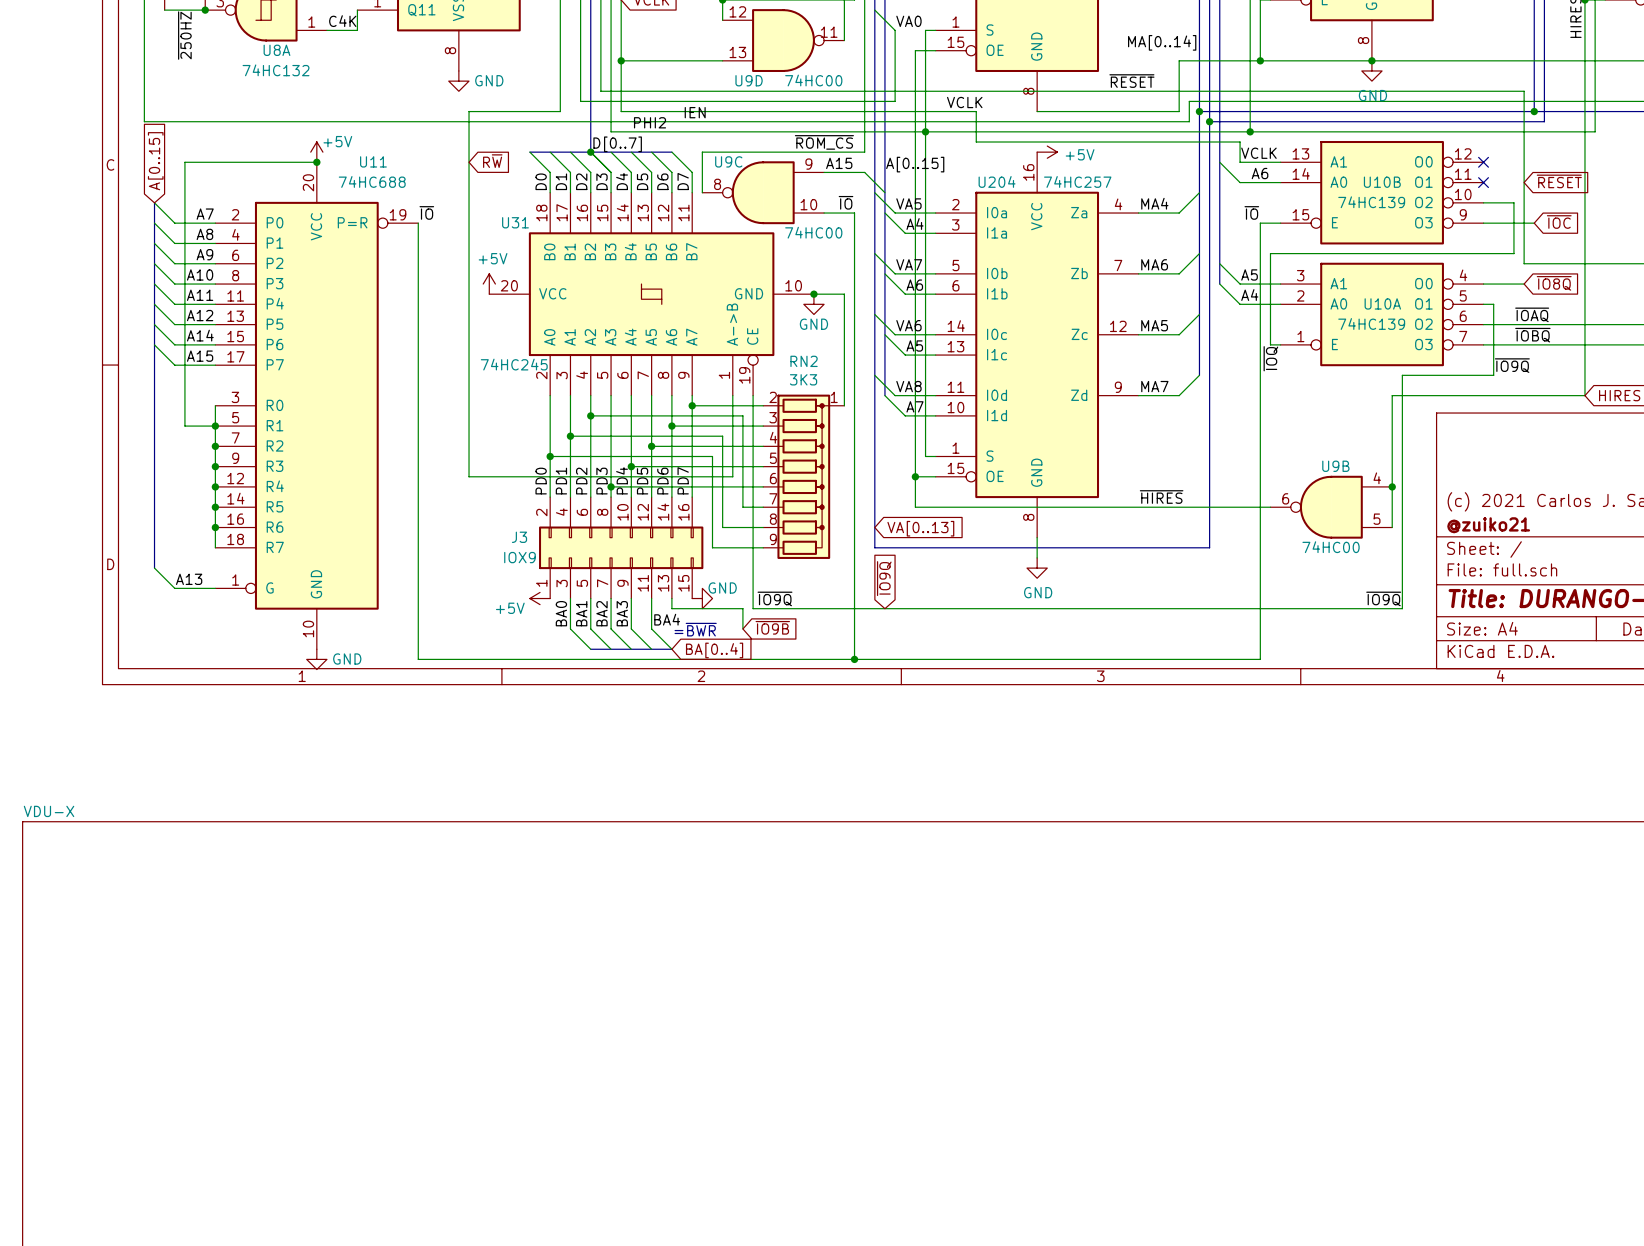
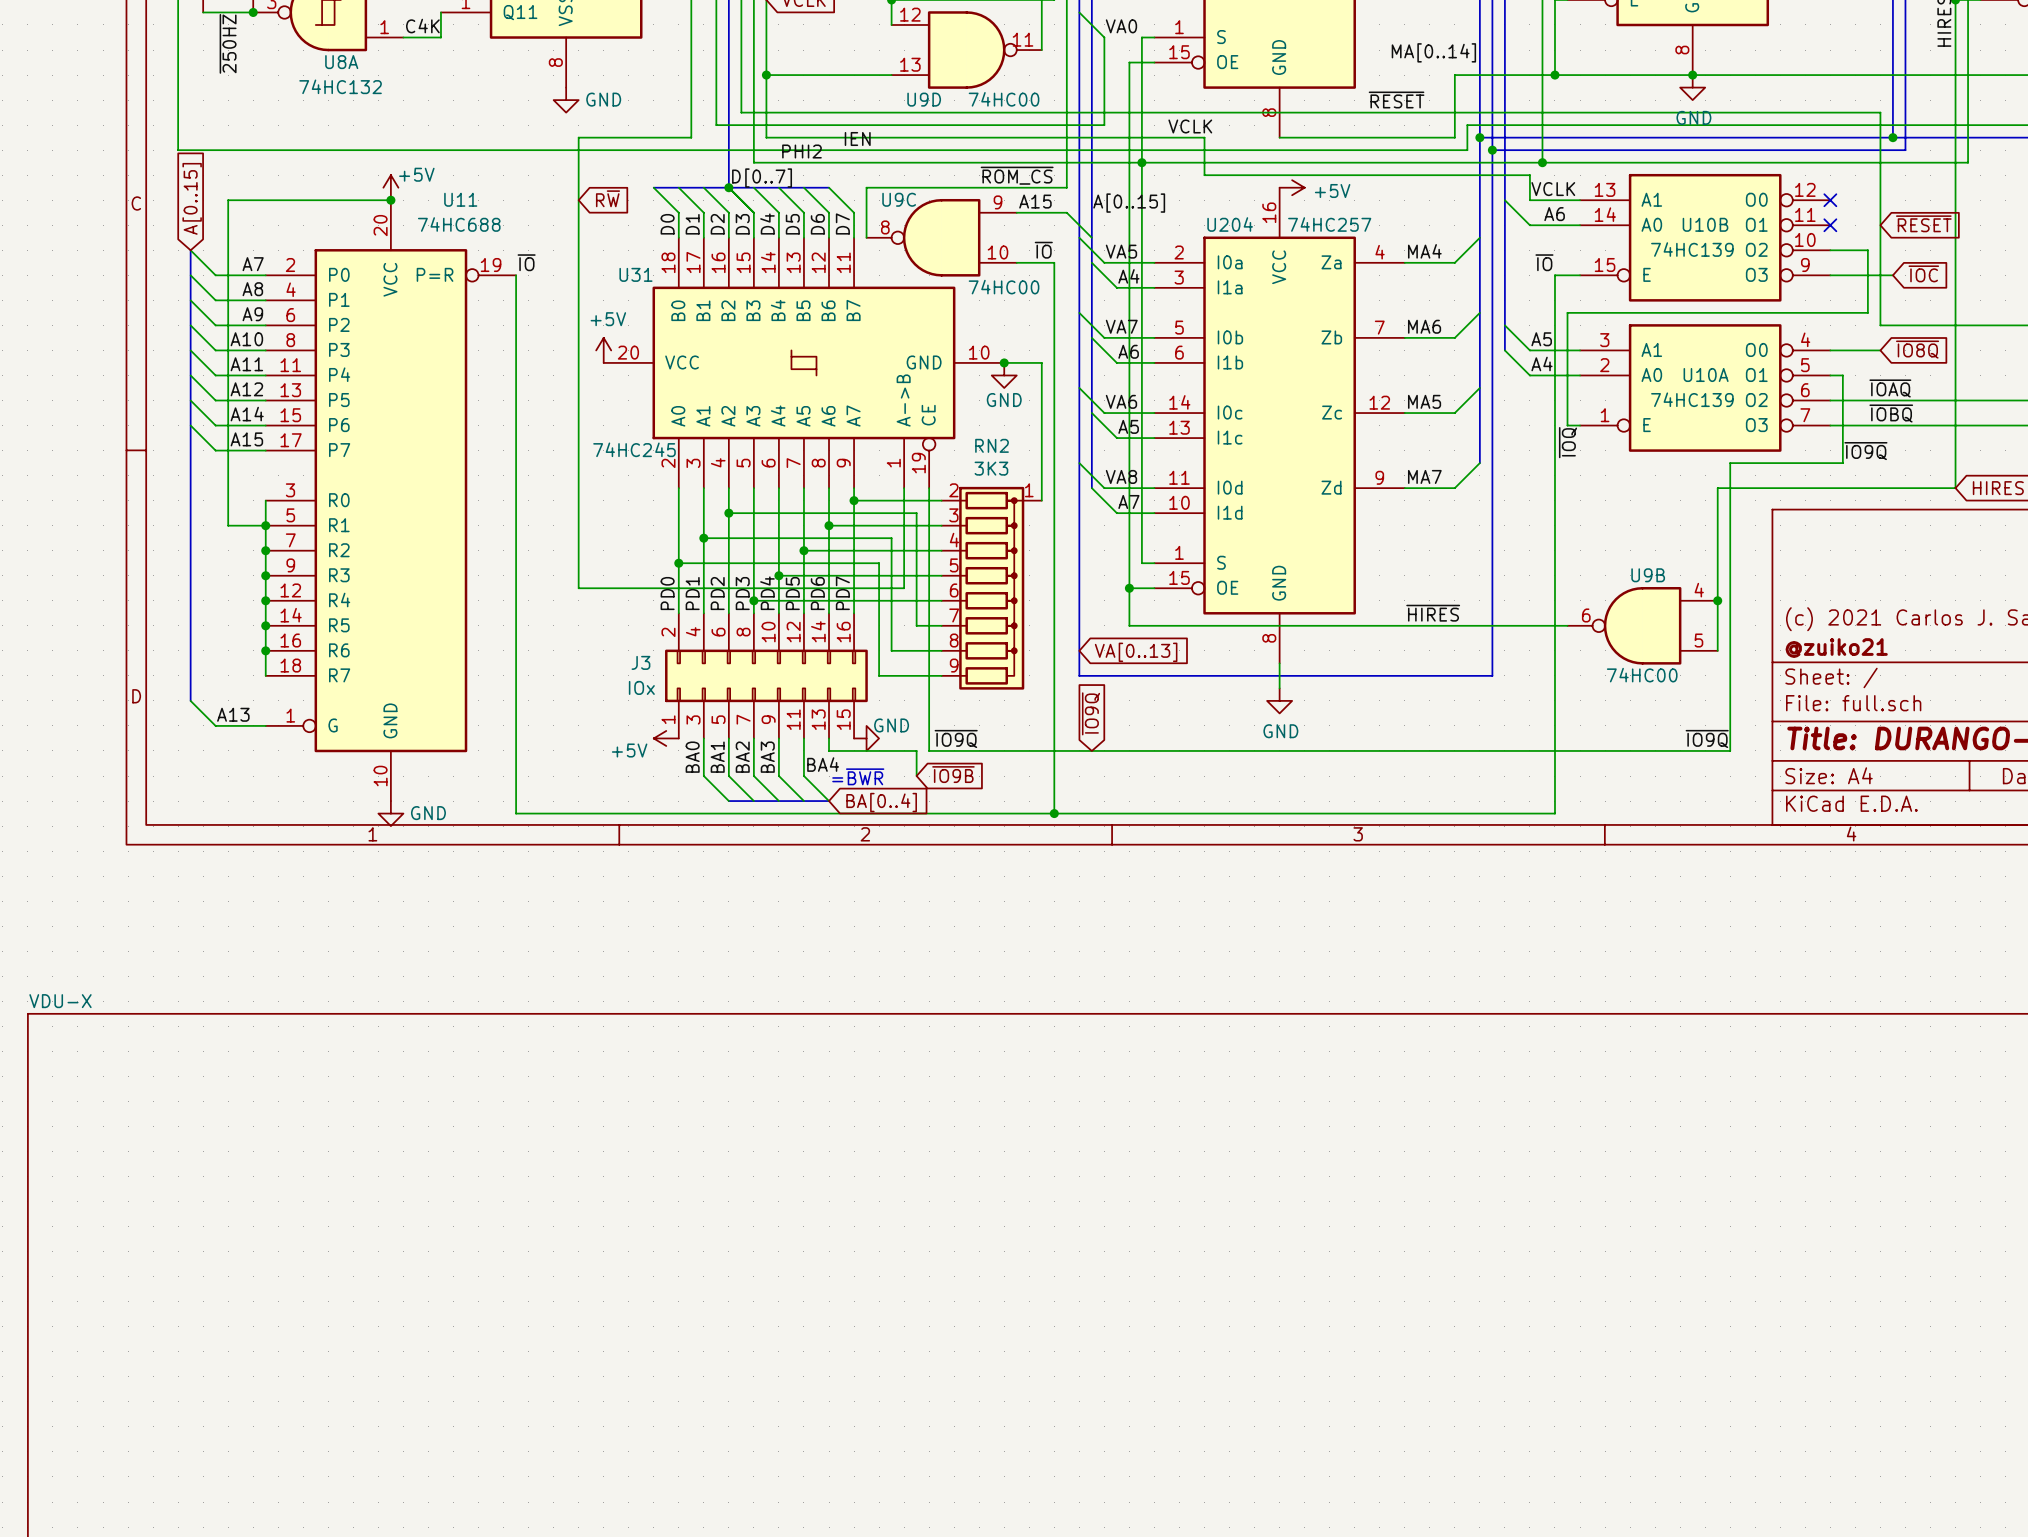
J3 value: IOX9 (519, 557) -> IOx (641, 687)

